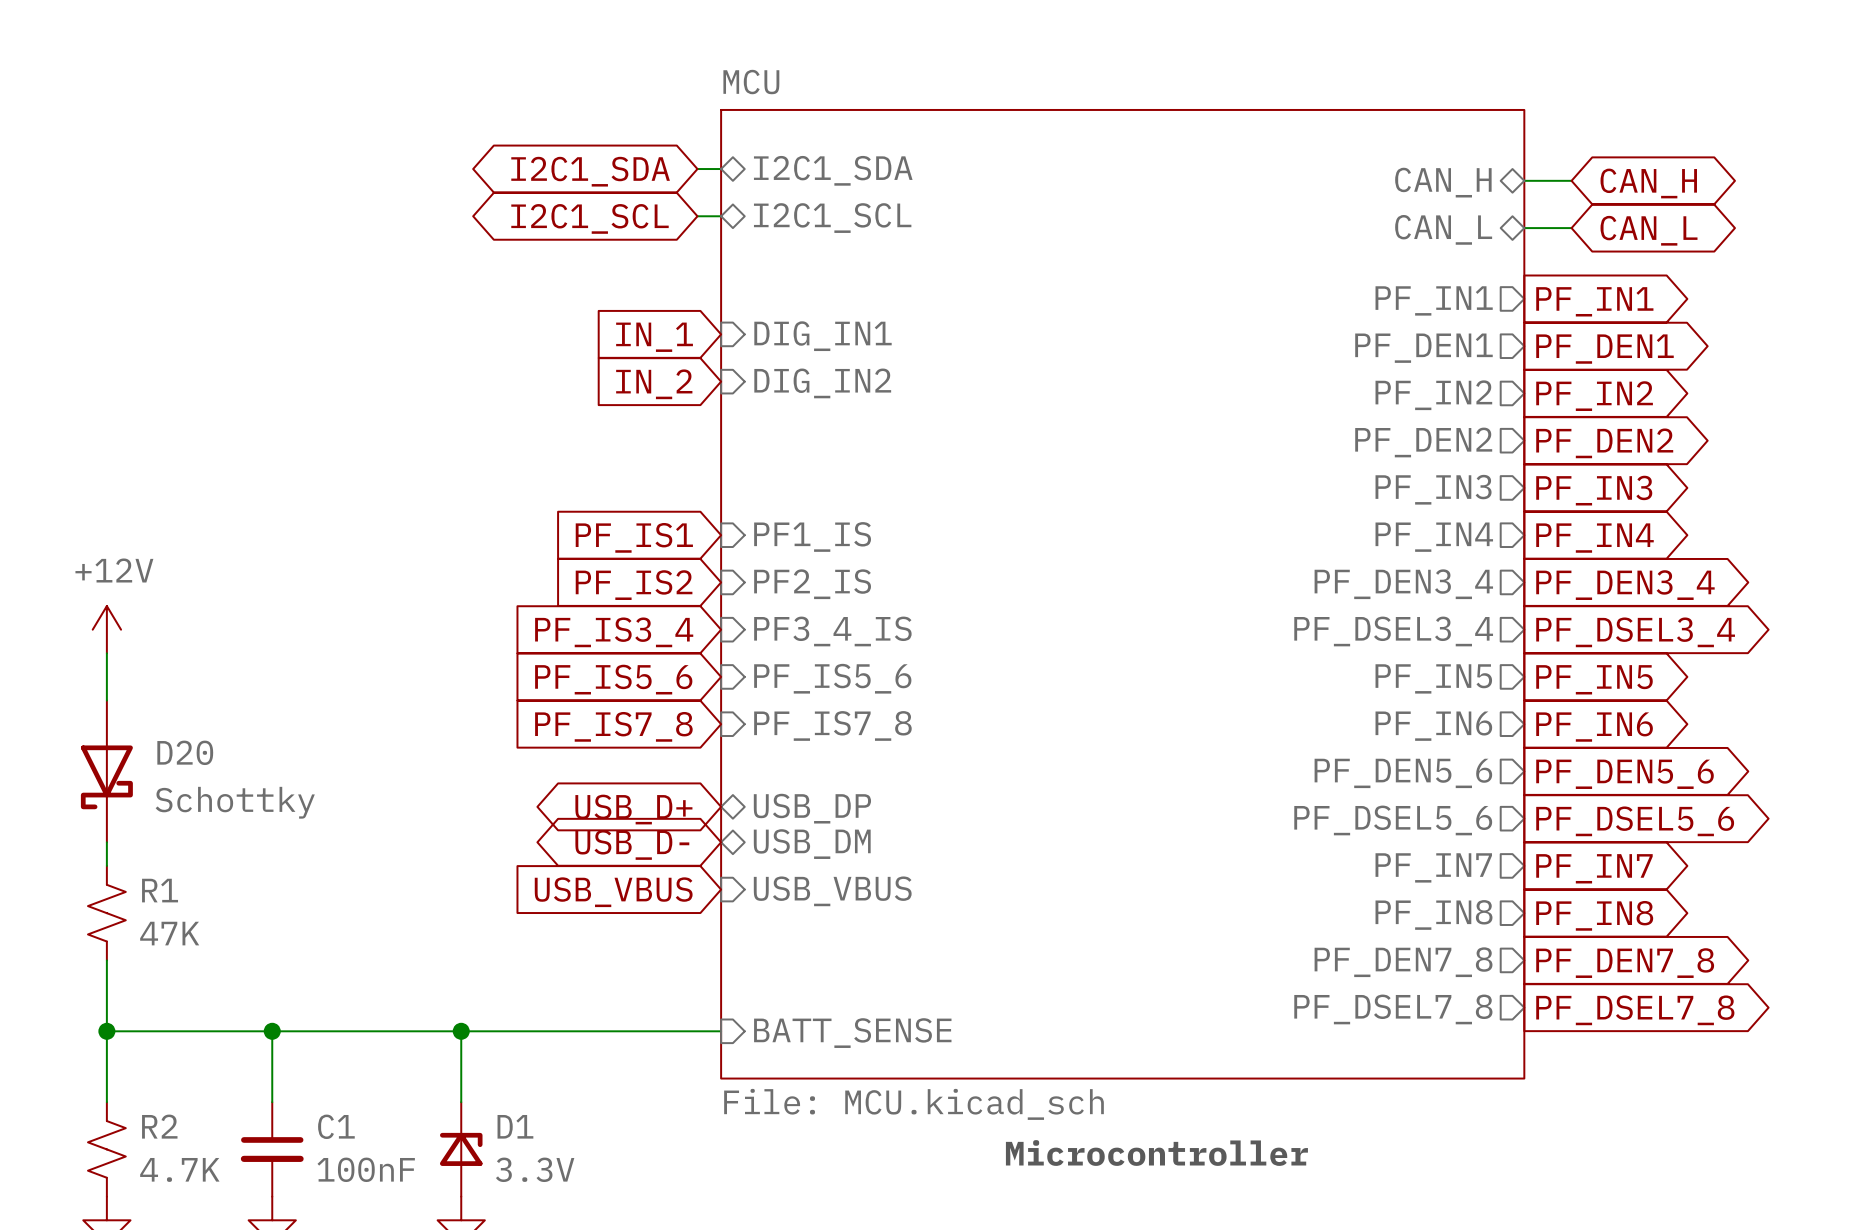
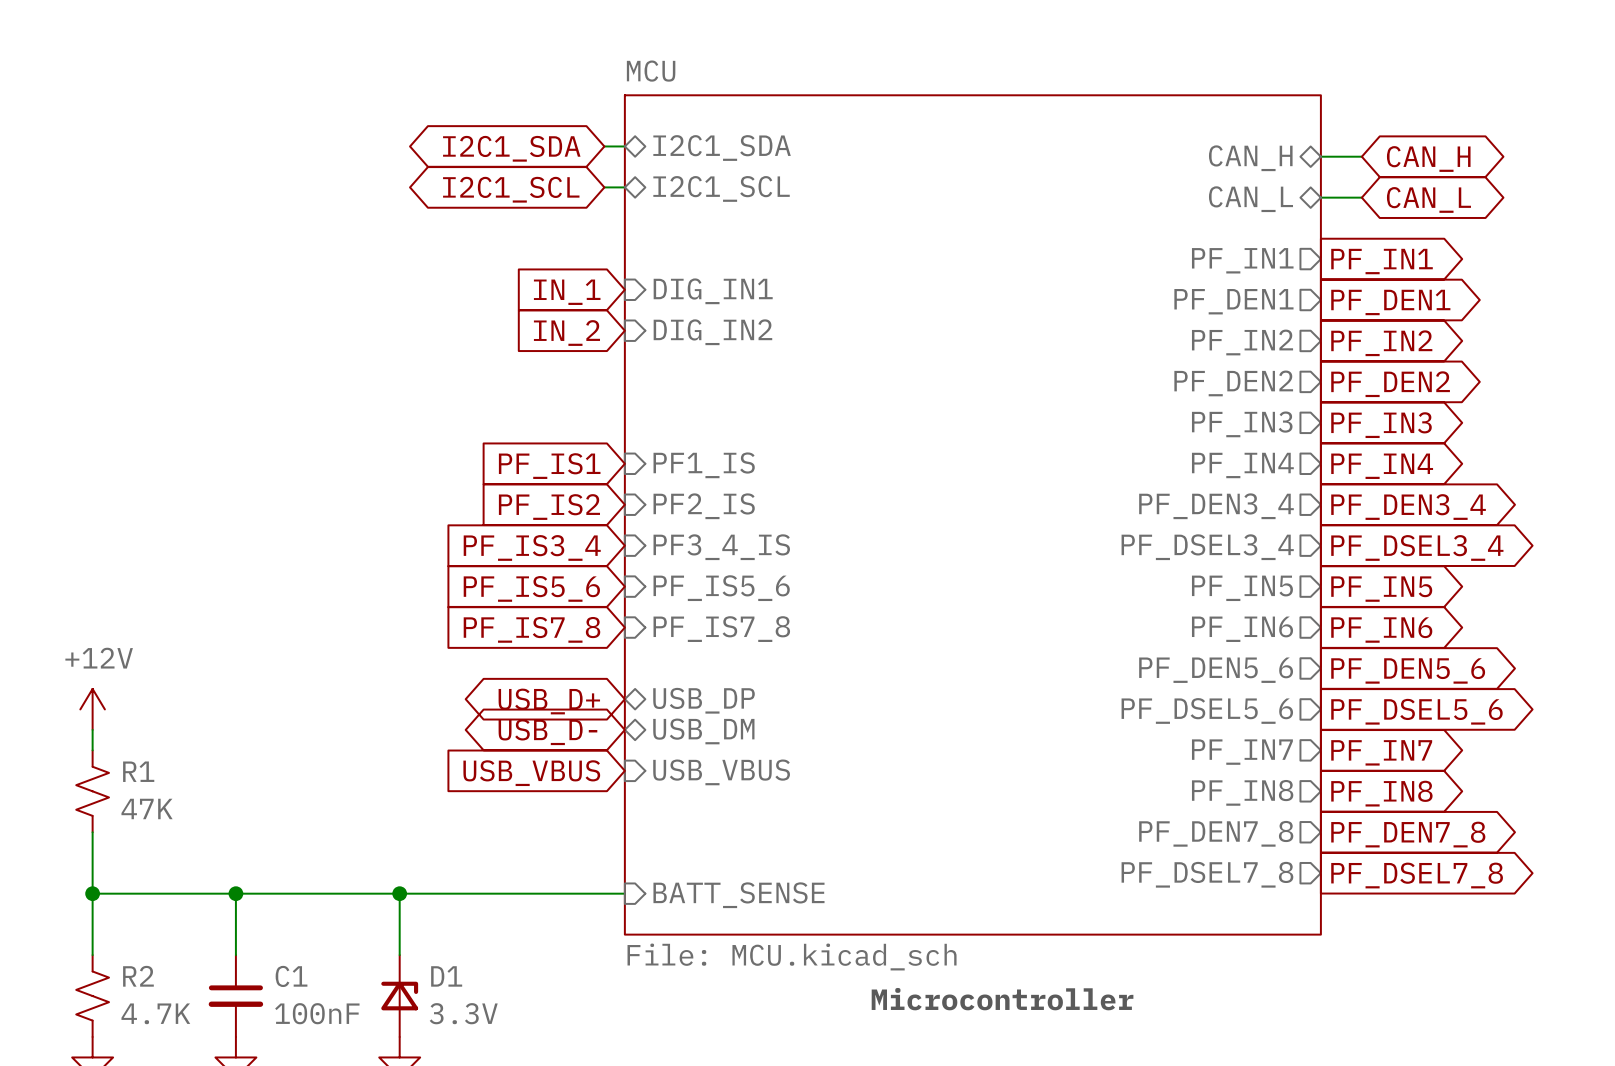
power symbol position: +12V (106, 629) -> +12V (92, 709)
wire: (106, 653) (106, 700) -> none
D20: Schottky (106, 771) -> none

